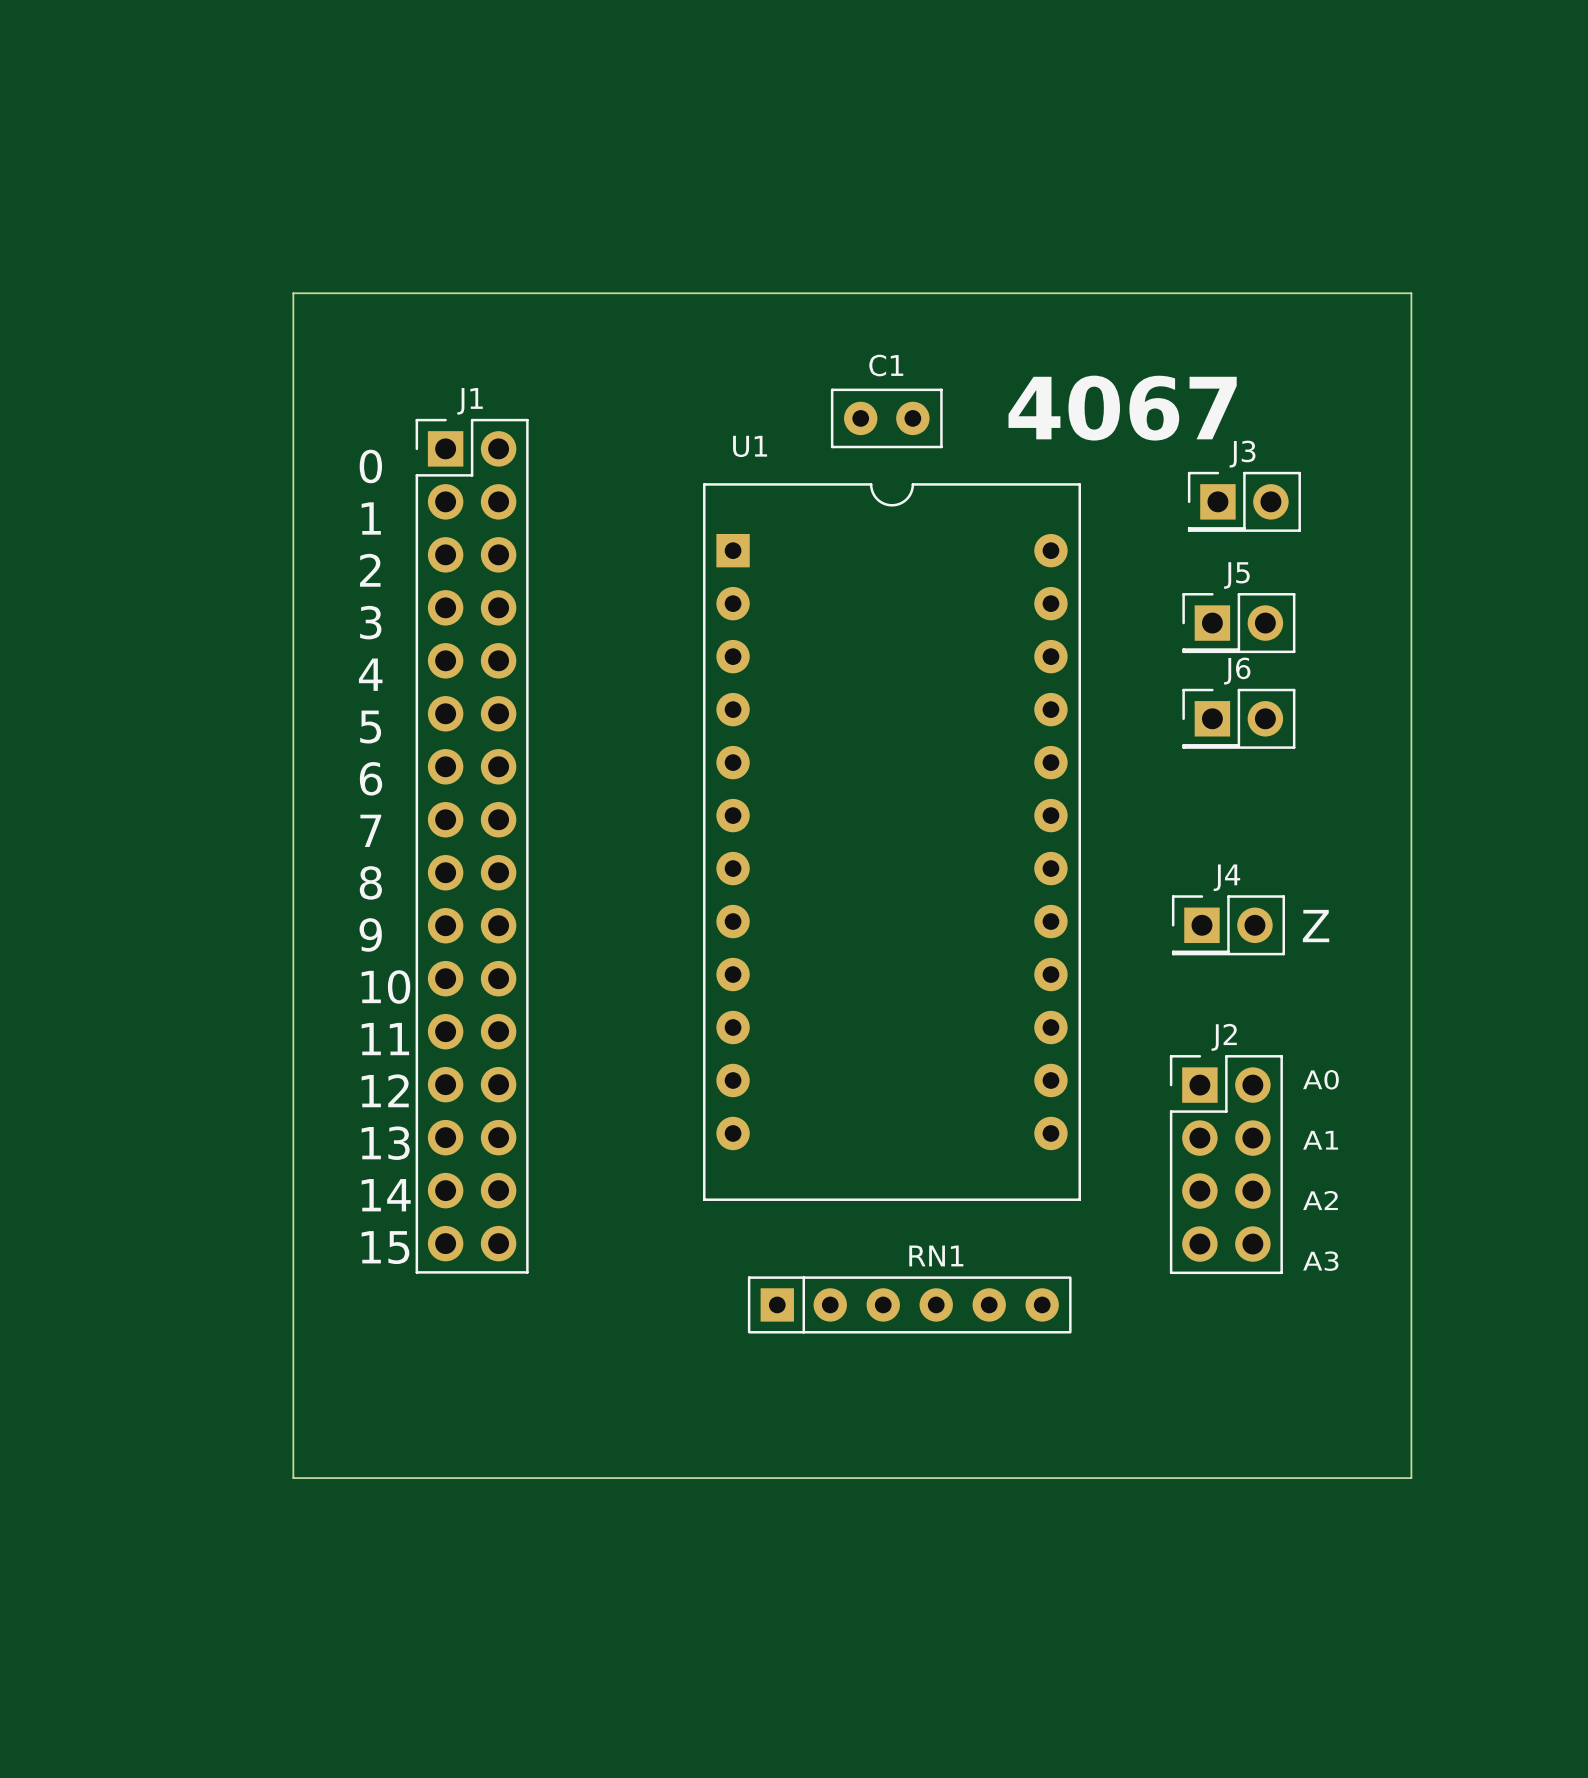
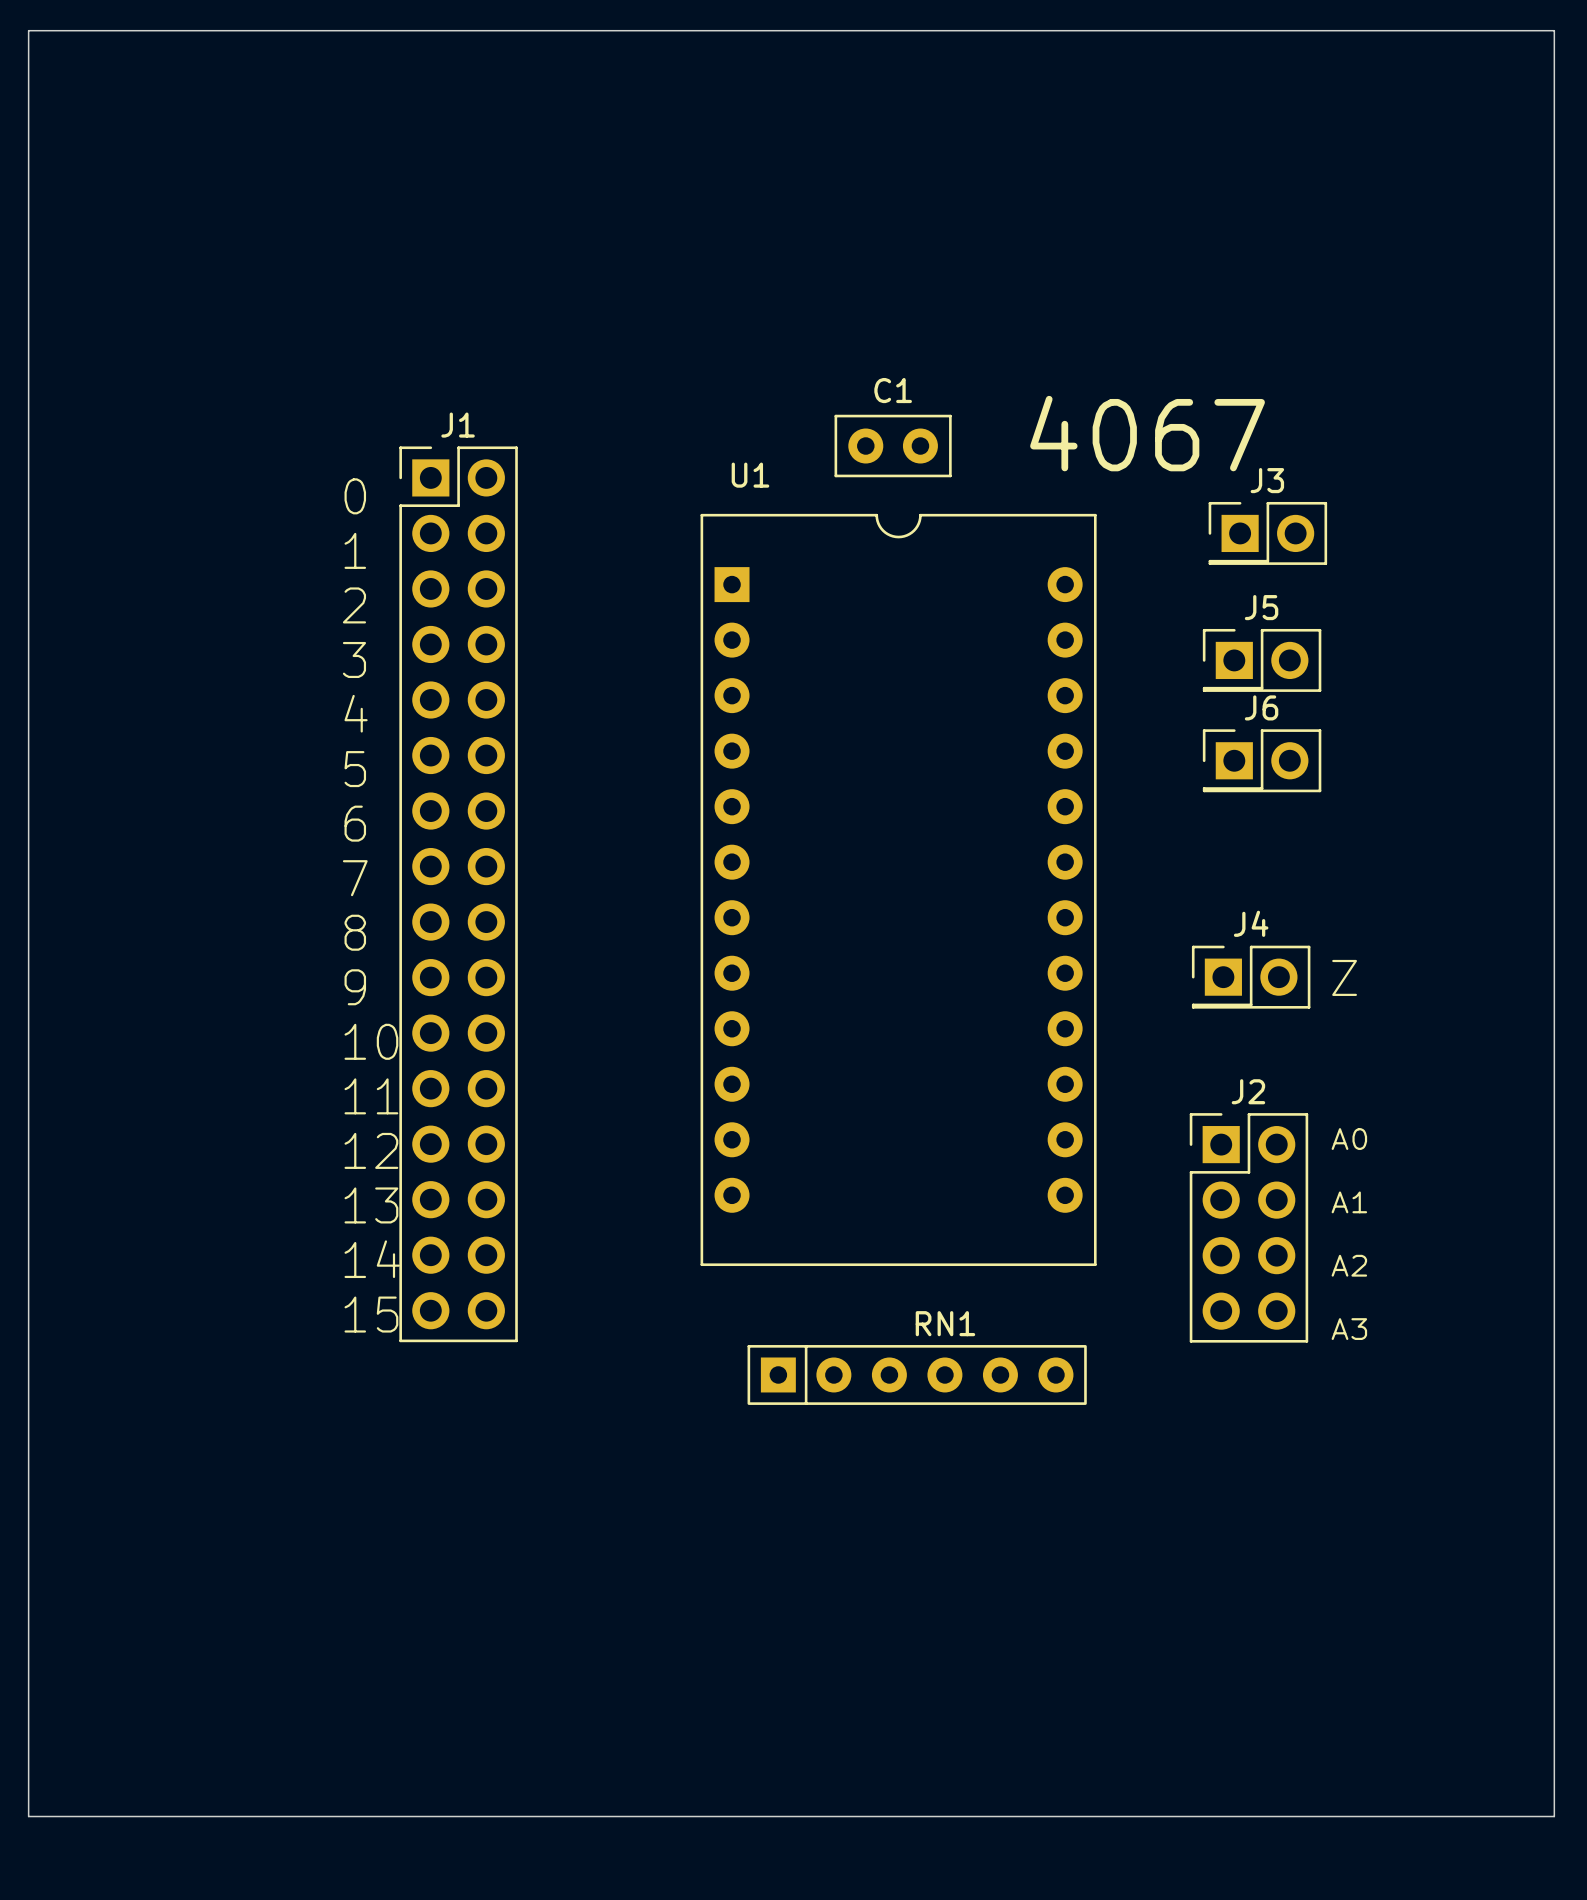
board edge: (293, 293) (1411, 293) (1411, 1478) (293, 1478) (293, 293) -> (28, 30) (28, 1816) (1554, 1816) (1554, 30) (28, 30)

